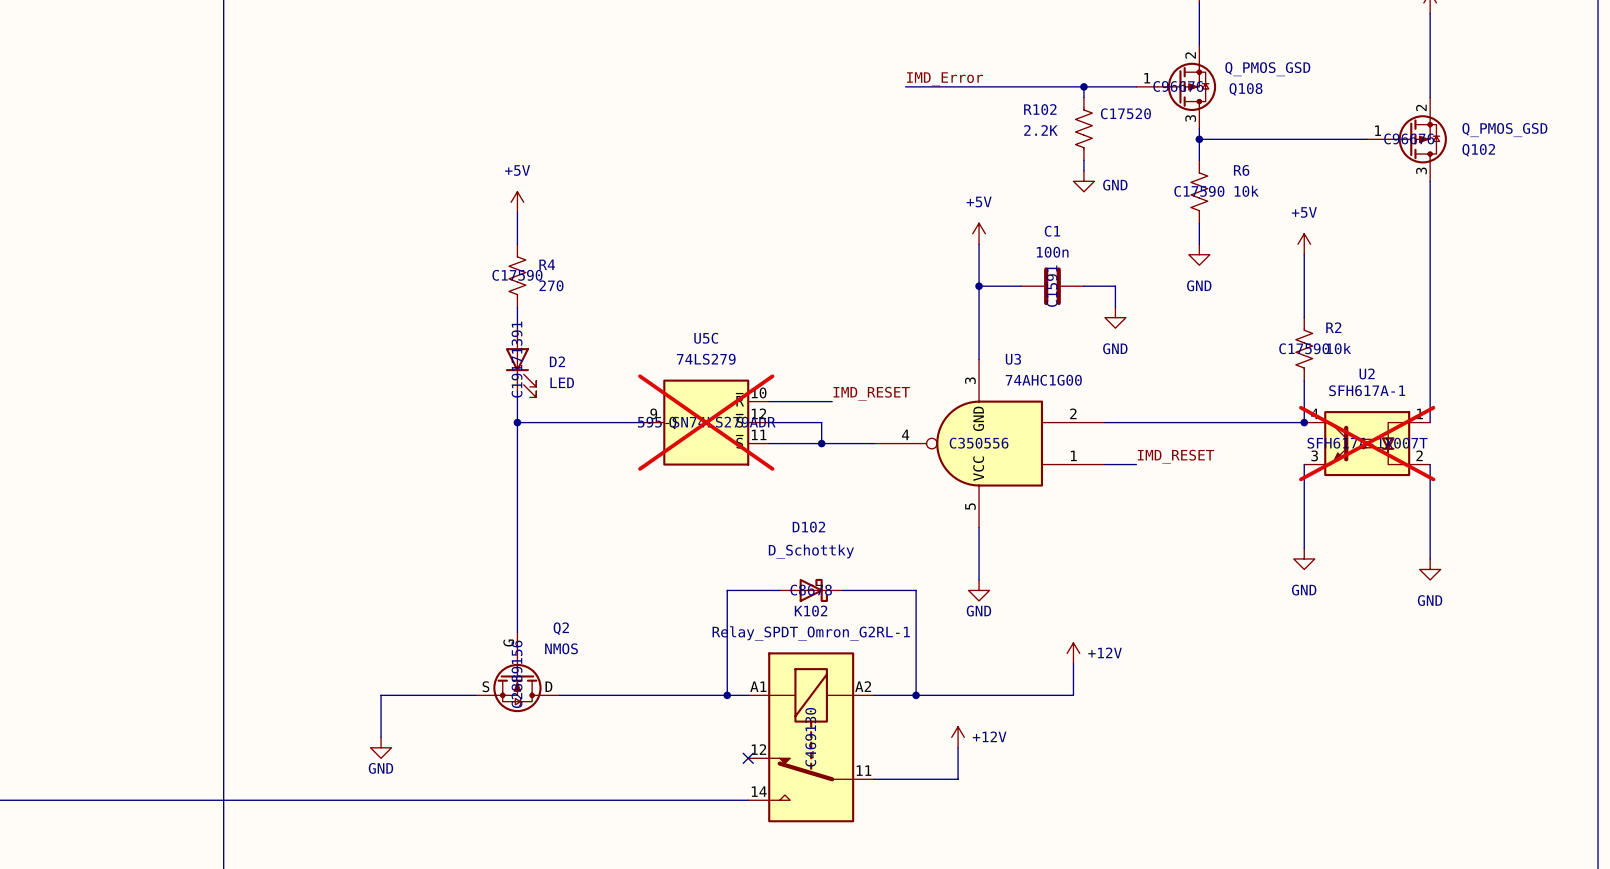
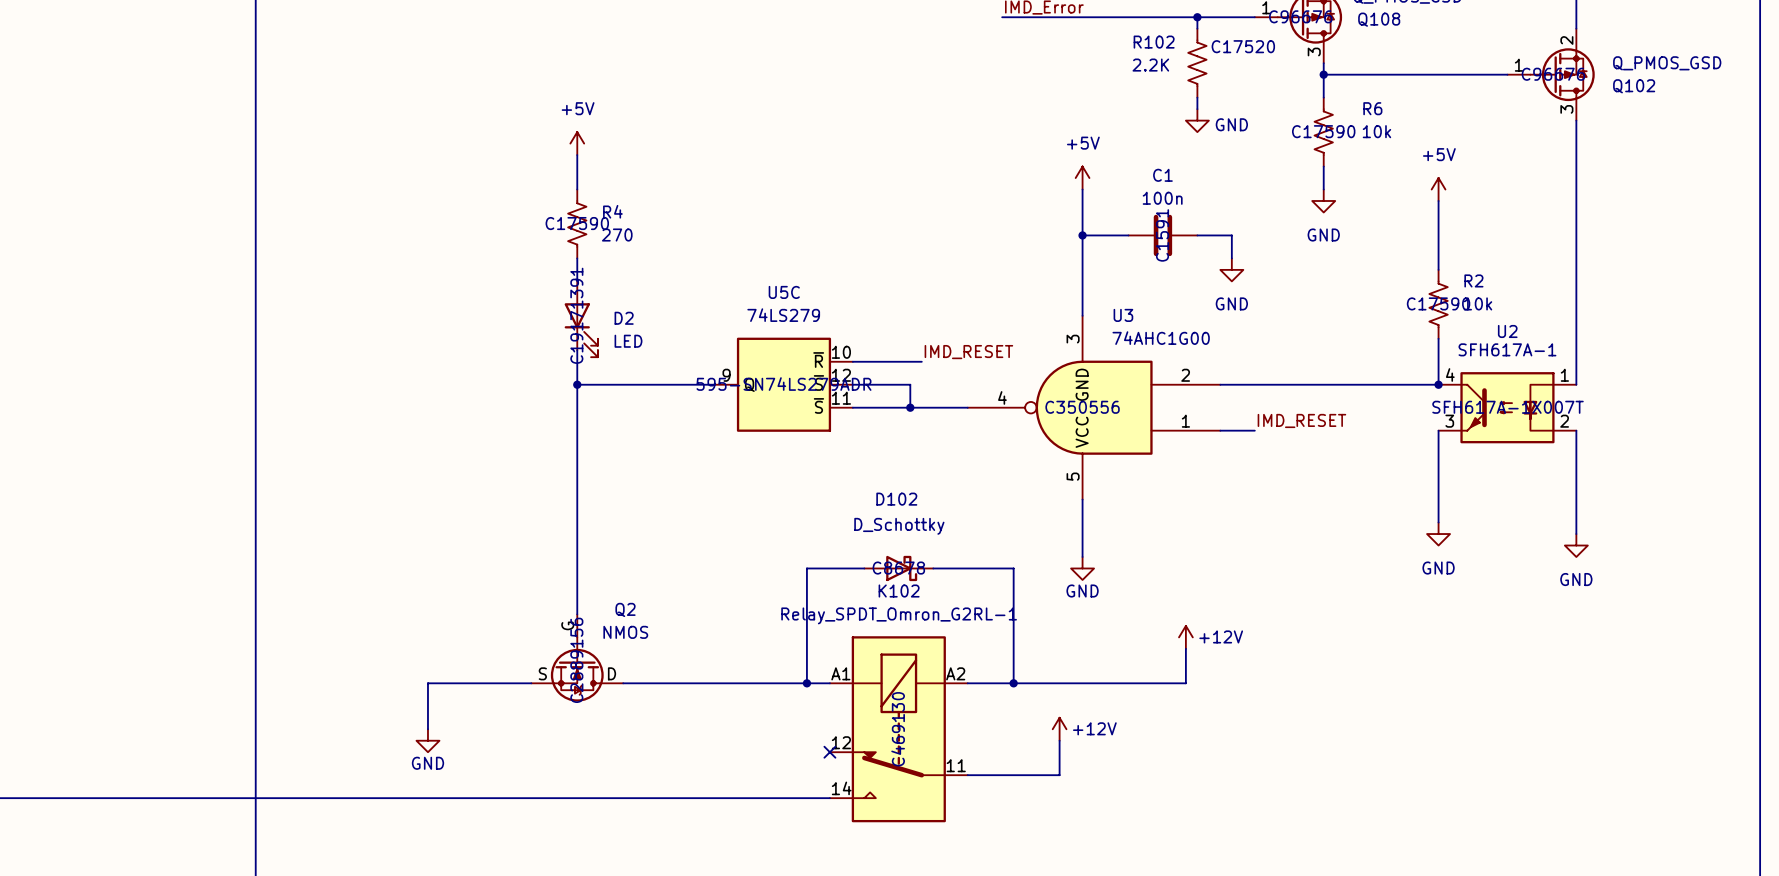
U5C do-not-place cross: (706, 422) -> none
U2 do-not-place cross: (1367, 443) -> none

